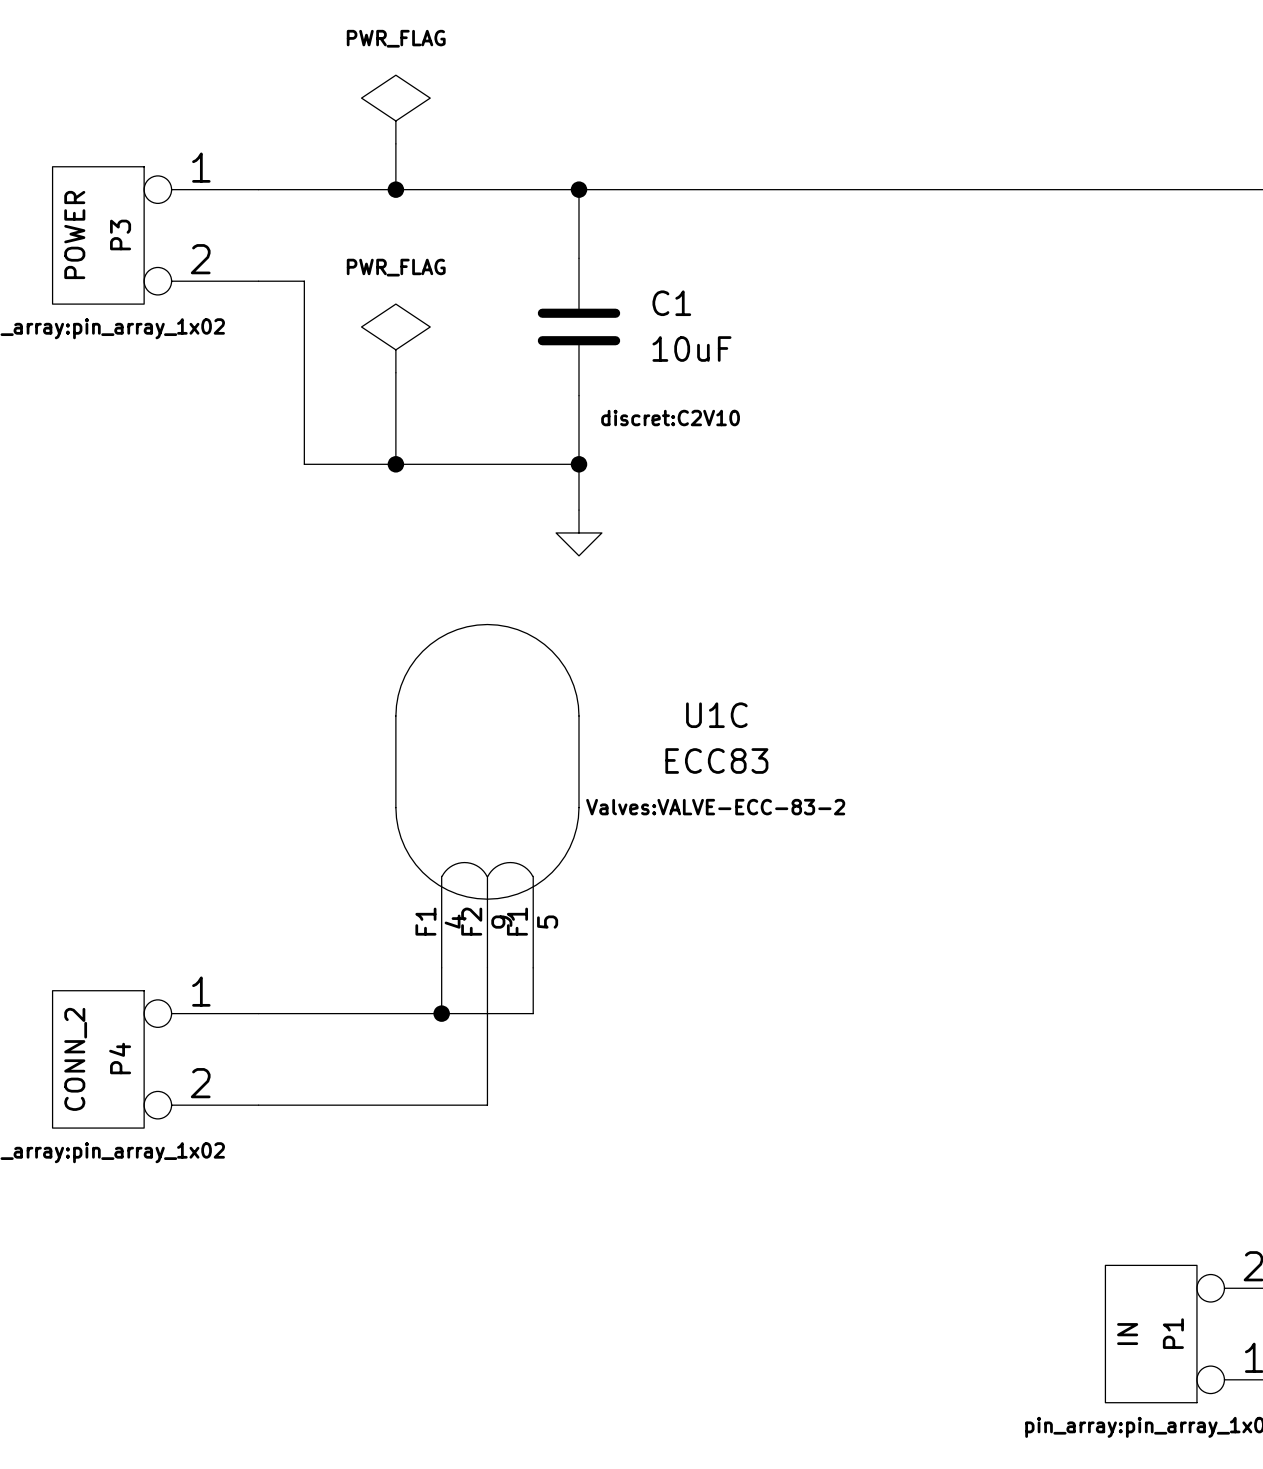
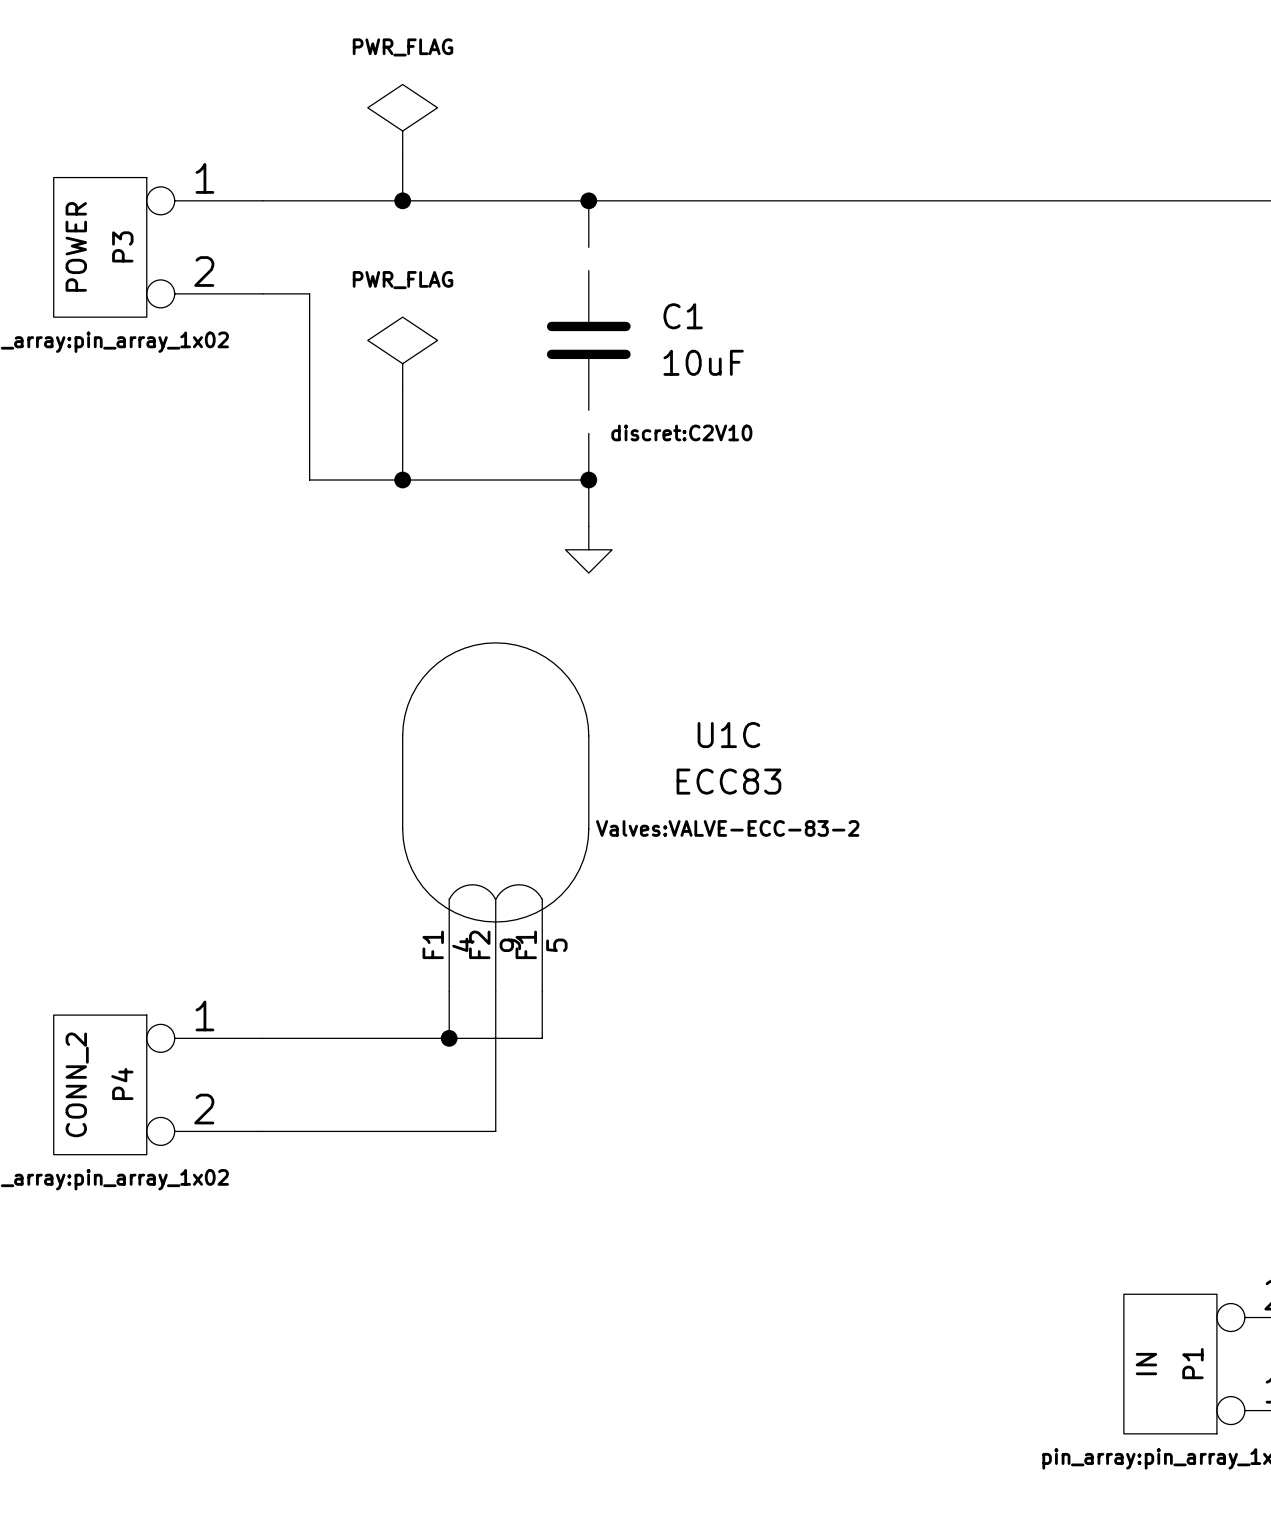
wire: (579, 235) (579, 258) -> none
wire: (579, 395) (579, 418) -> none

